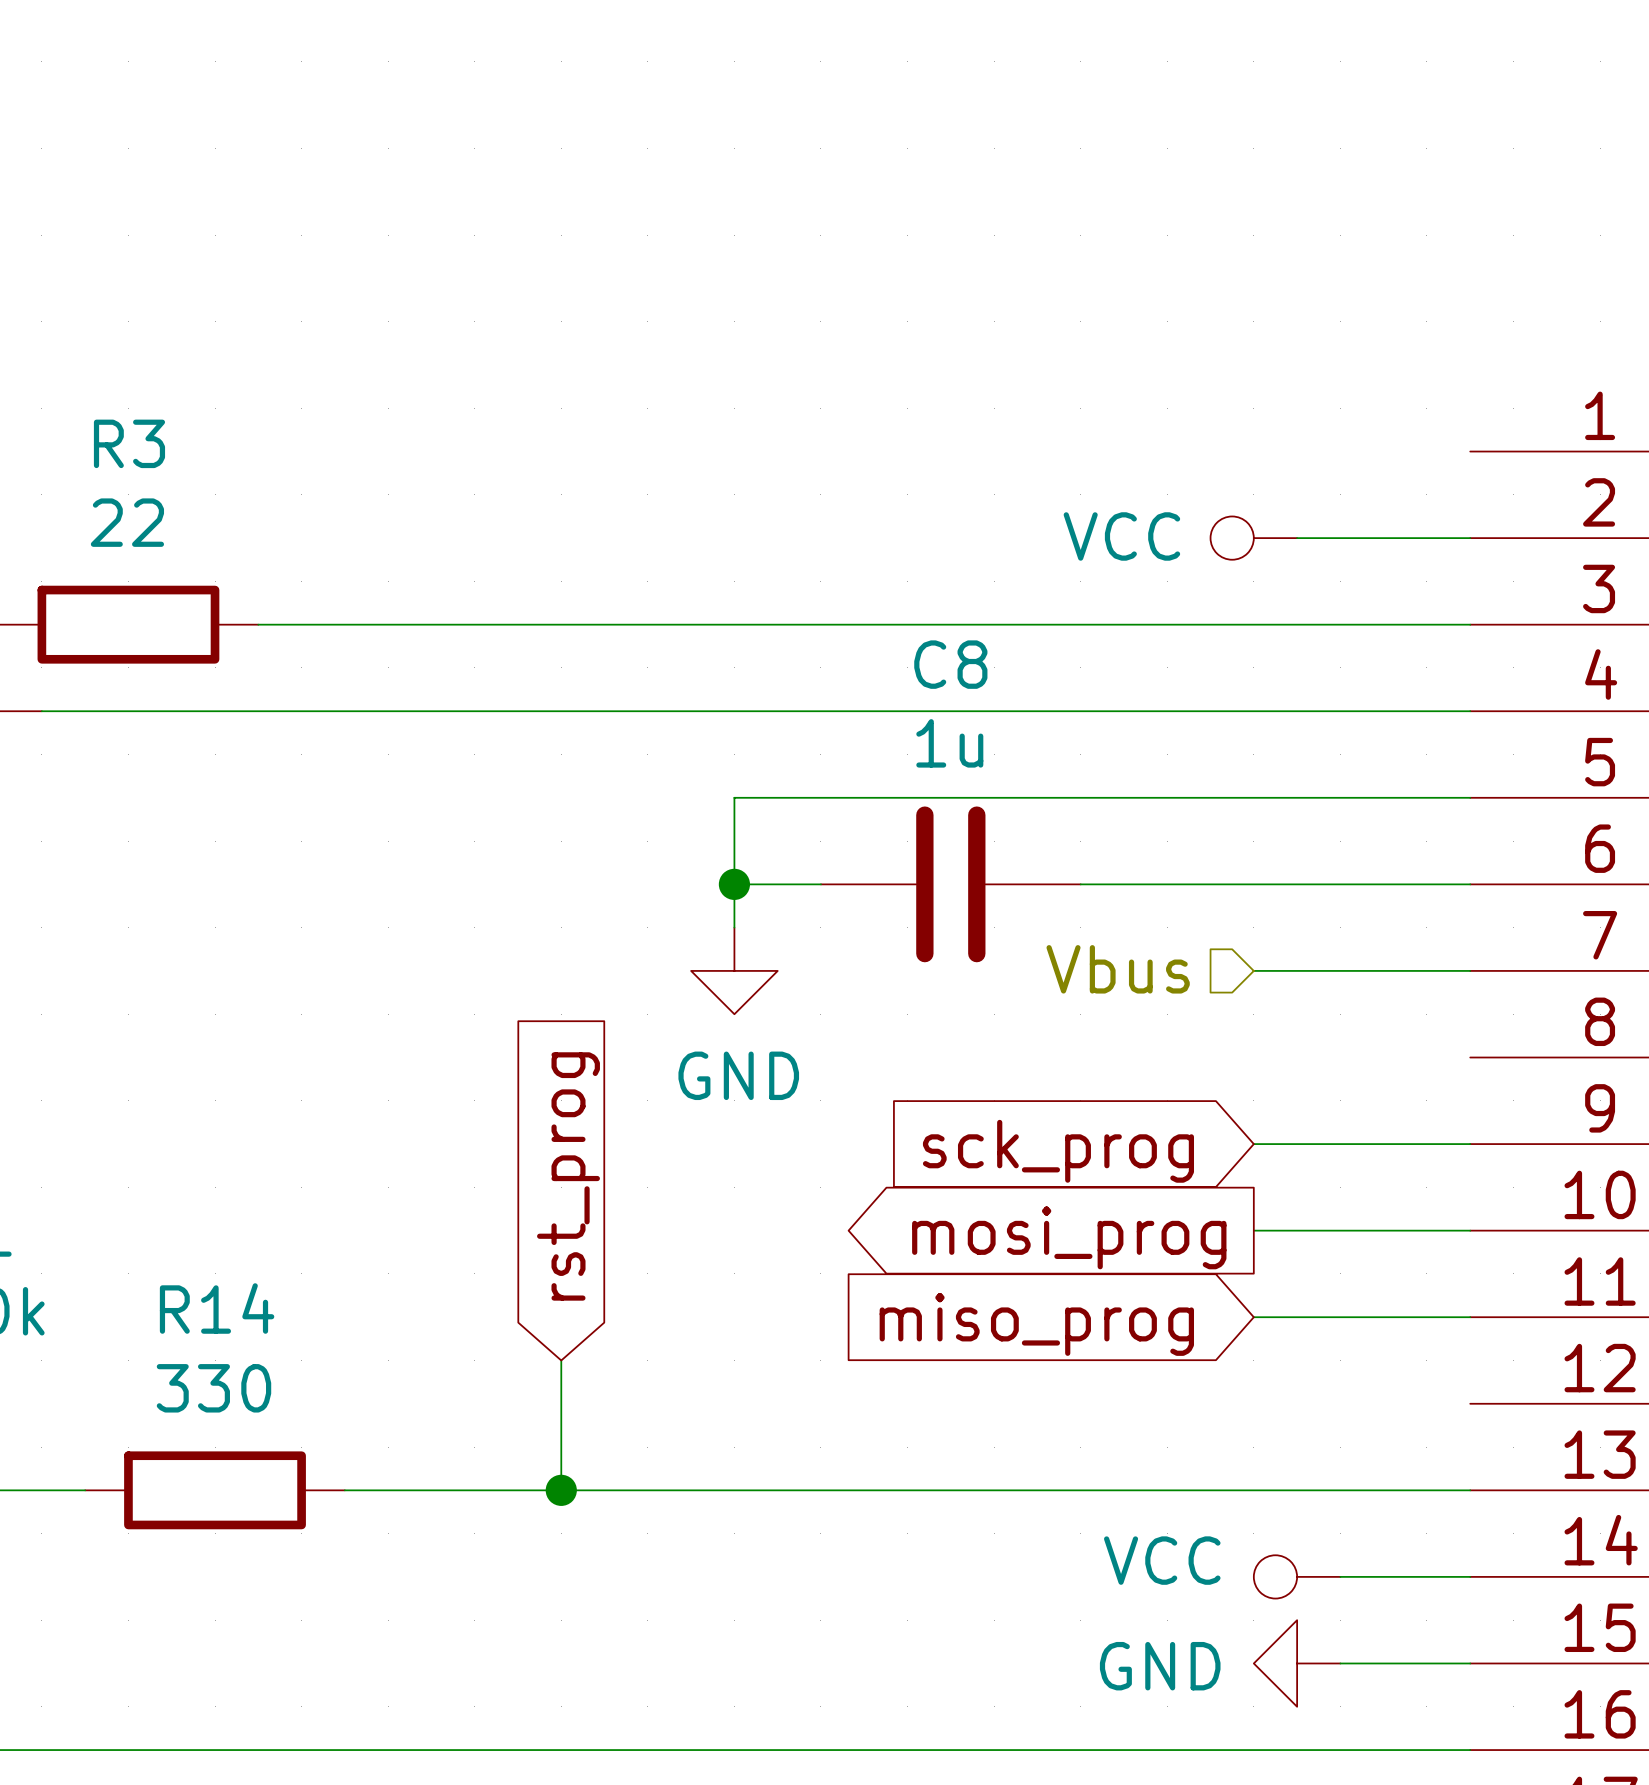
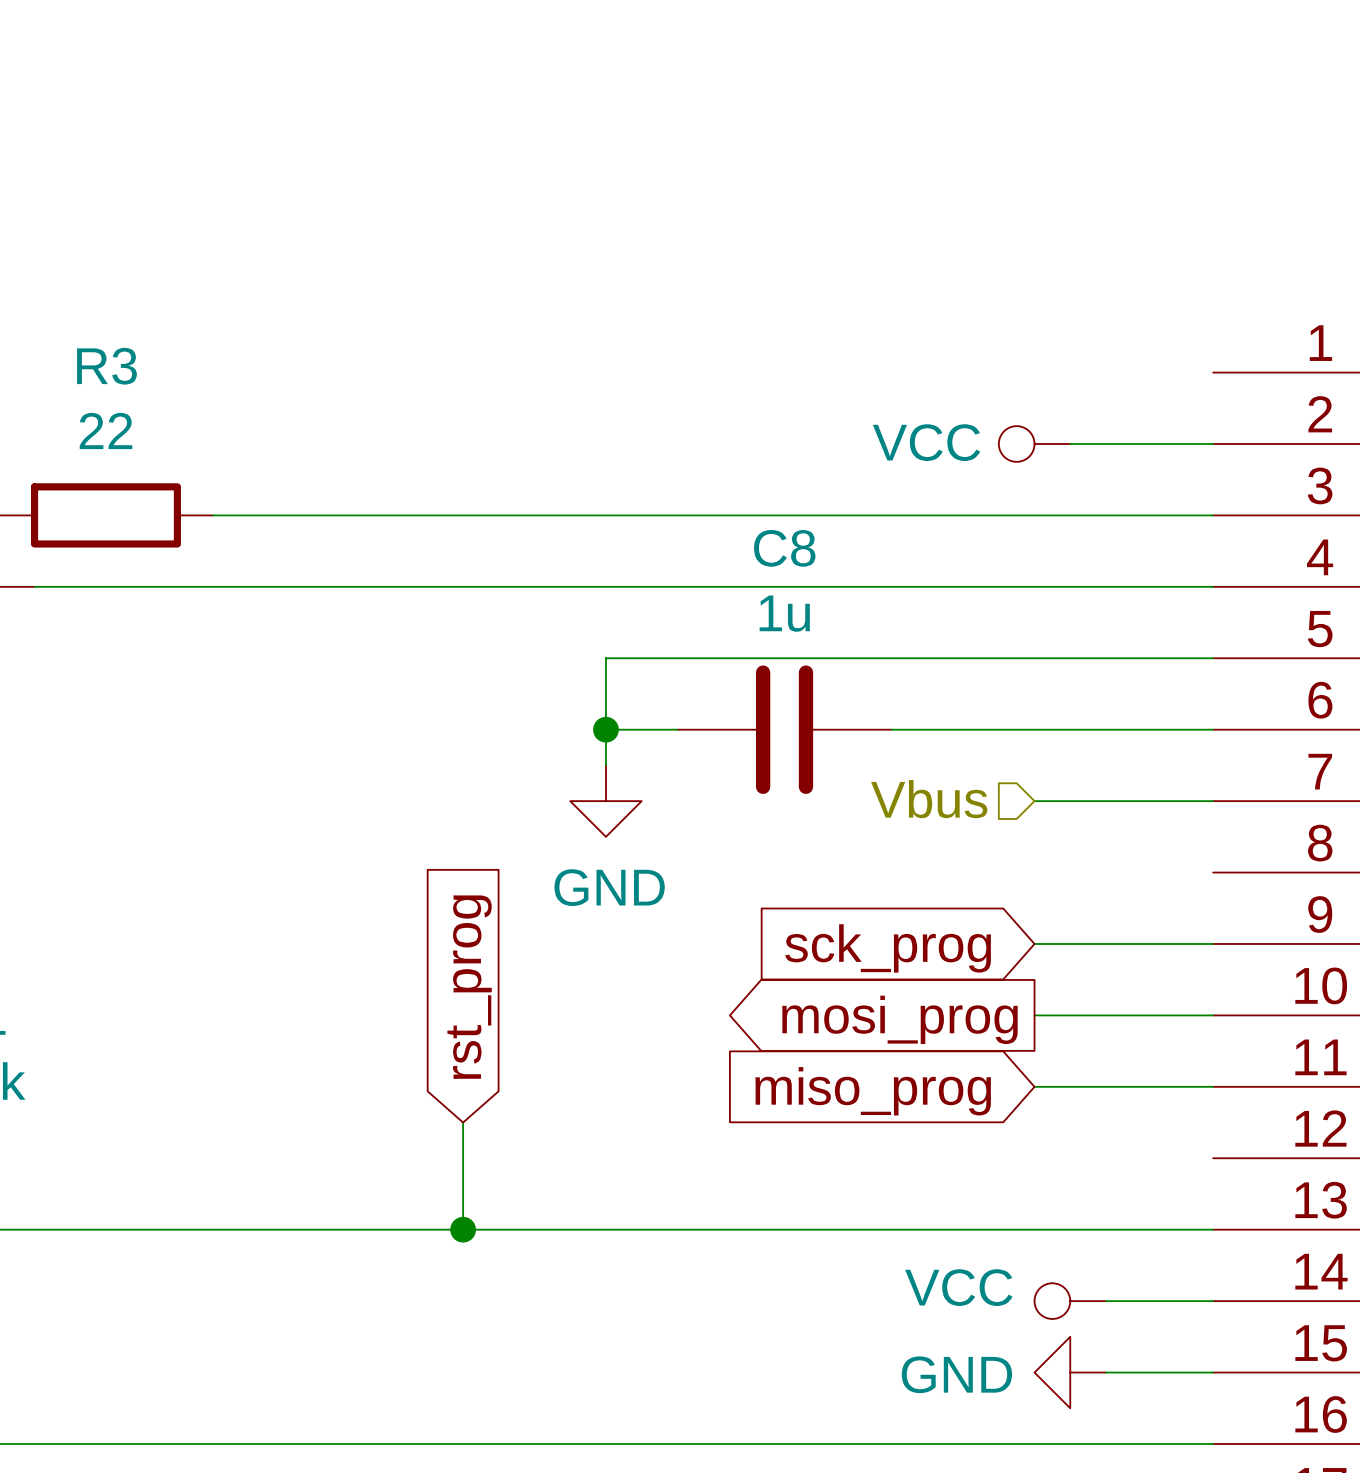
wire: none -> (70, 1229) (284, 1229)
R14: 330 (215, 1490) -> none

